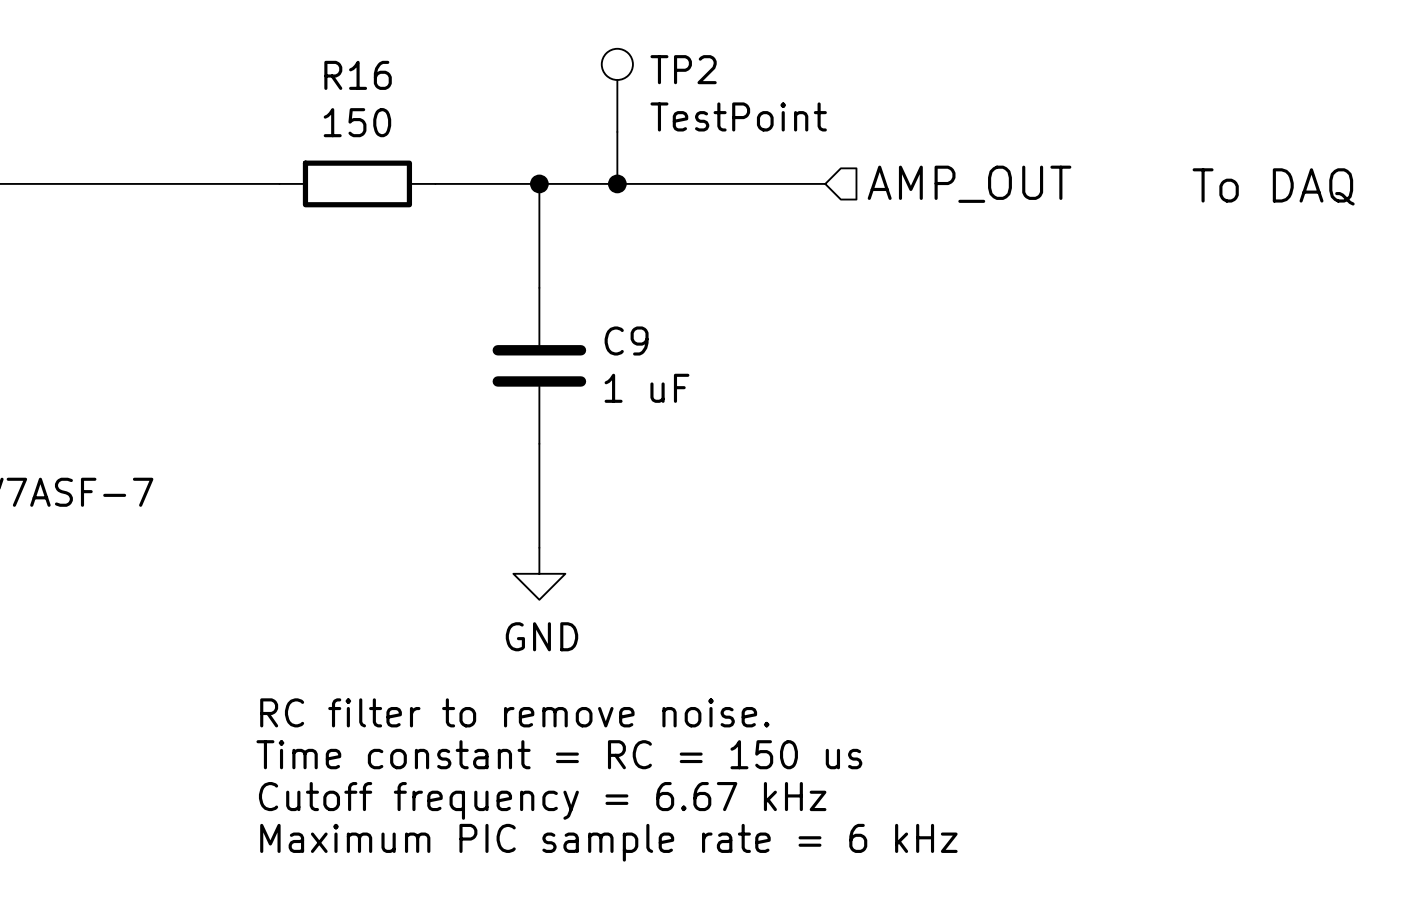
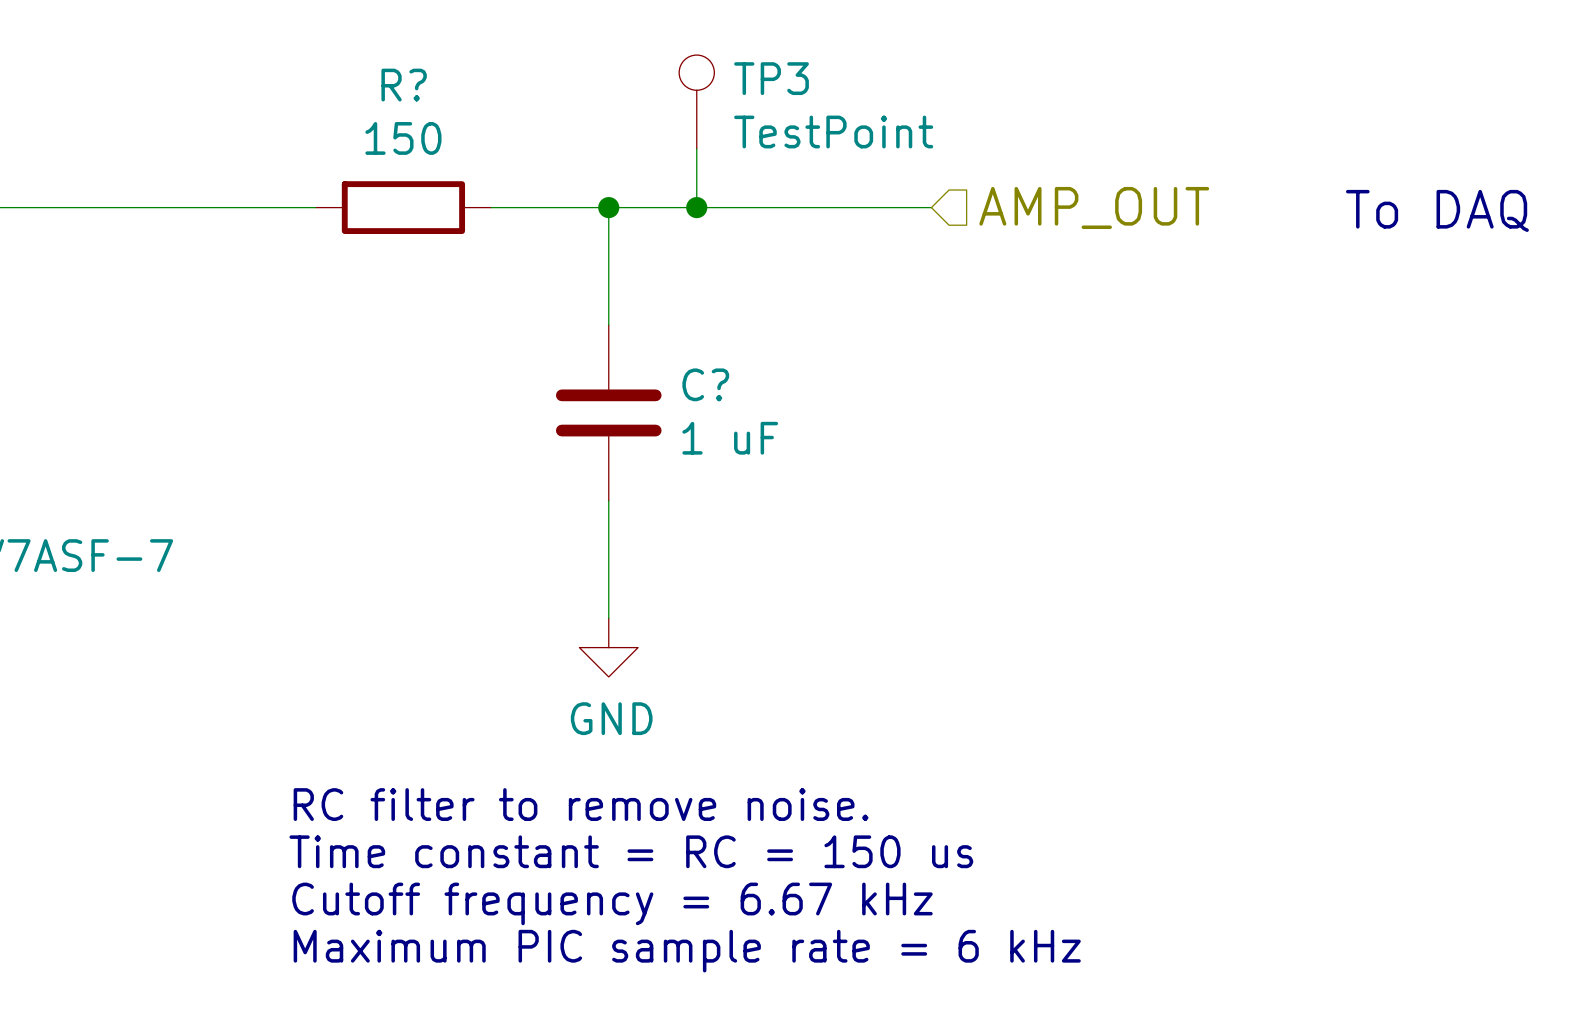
TP2 name: TP2 (683, 69) -> TP3 (771, 78)
R16 name: R16 (358, 75) -> R? (404, 85)
C9 name: C9 (626, 340) -> C? (705, 384)

